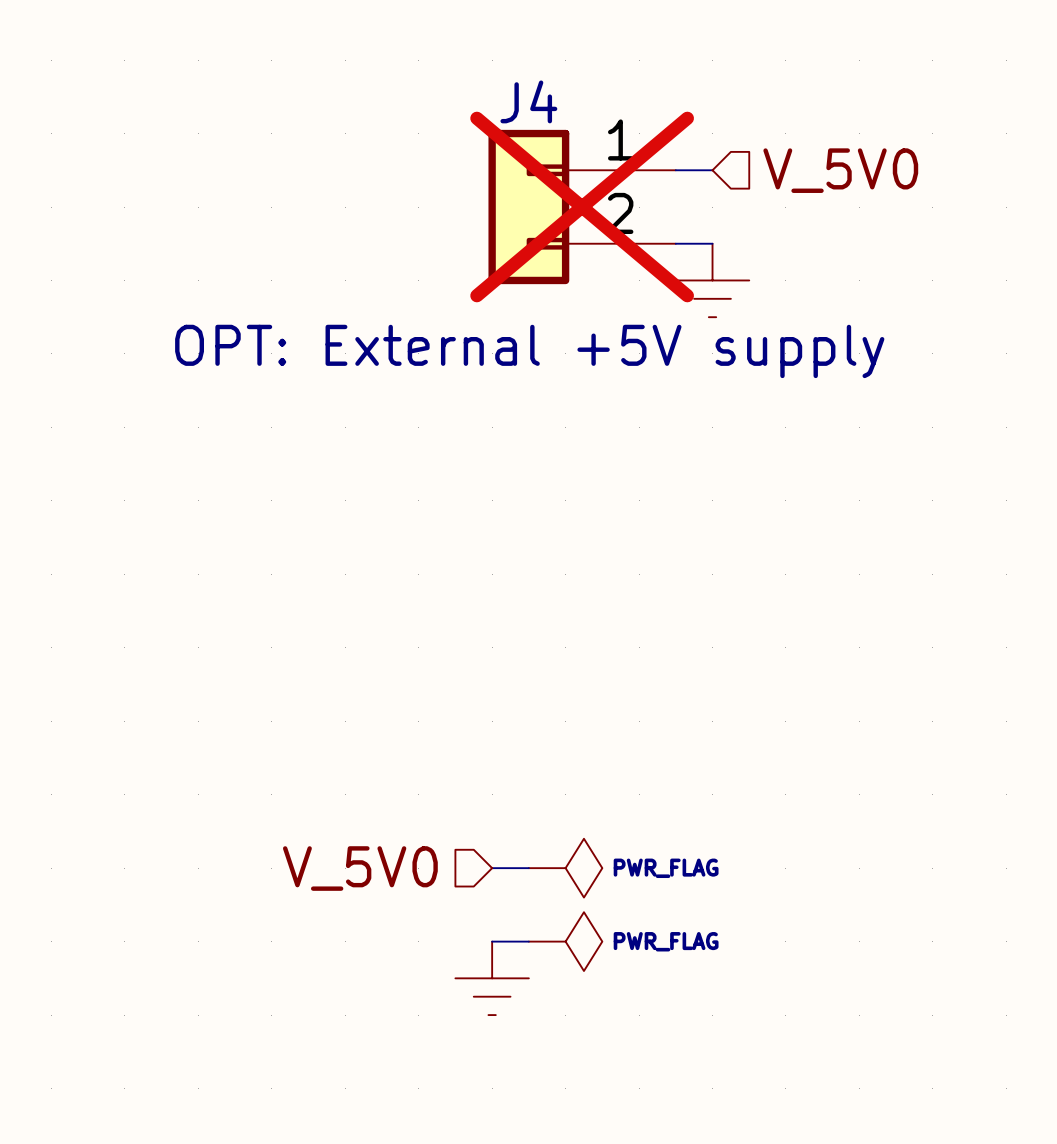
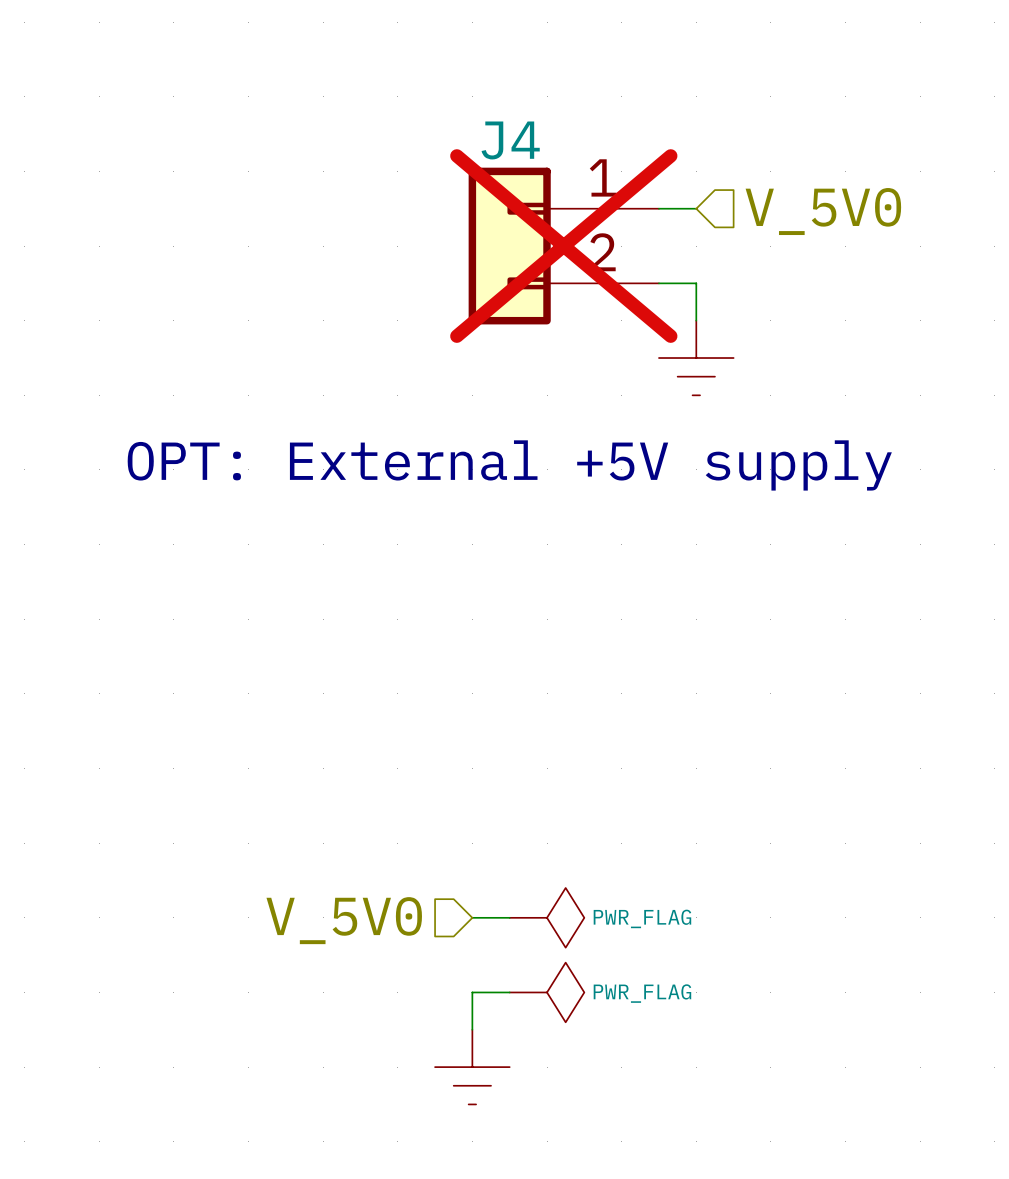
power symbol position: (712, 280) -> (696, 358)
text position: OPT: External +5V supply (529, 351) -> OPT: External +5V supply (509, 465)
power symbol position: (492, 978) -> (472, 1067)

